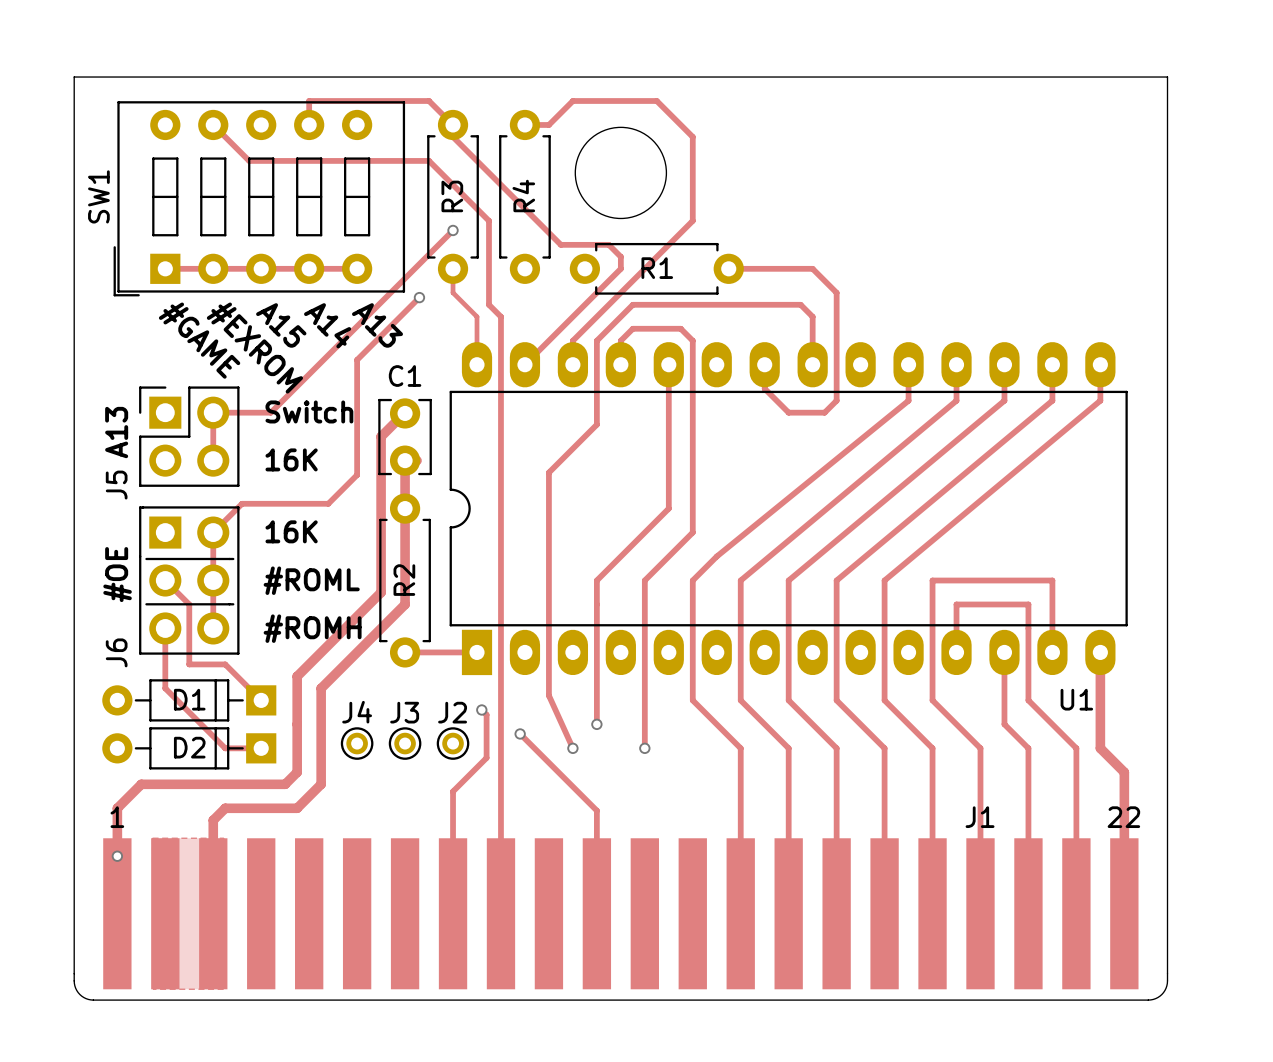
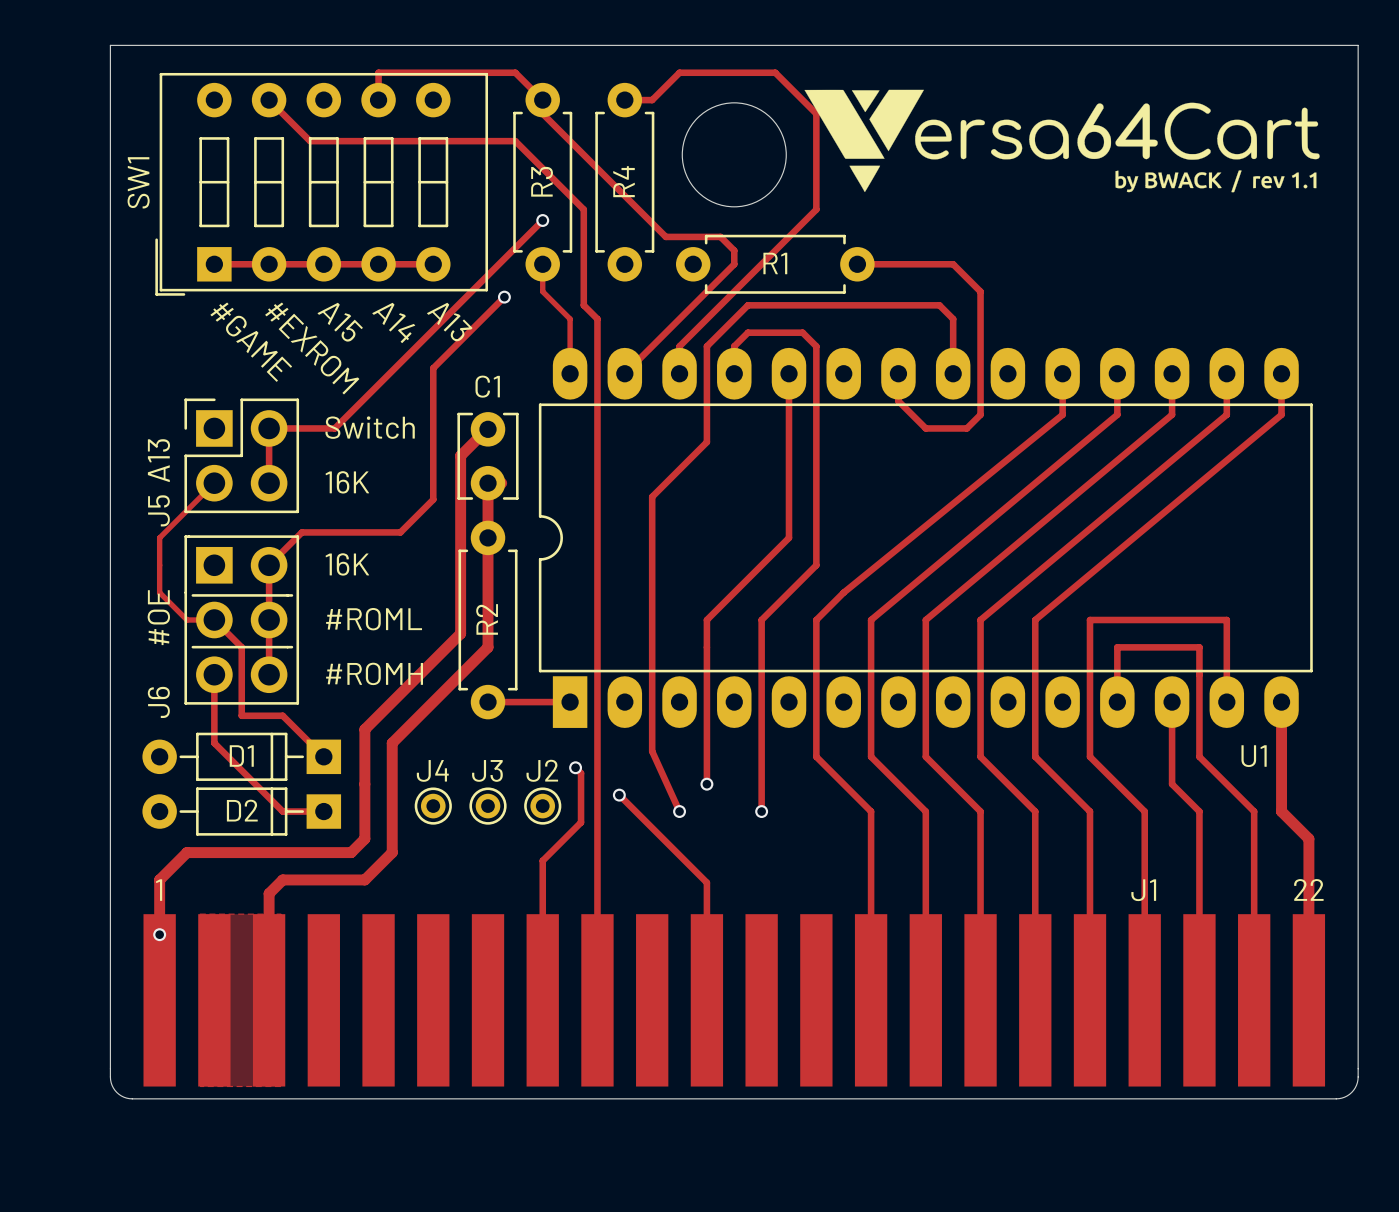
drawing: none -> [804, 89, 1320, 193]
track: none -> (214, 483) (159, 537) (159, 592) (187, 620) (214, 620)

